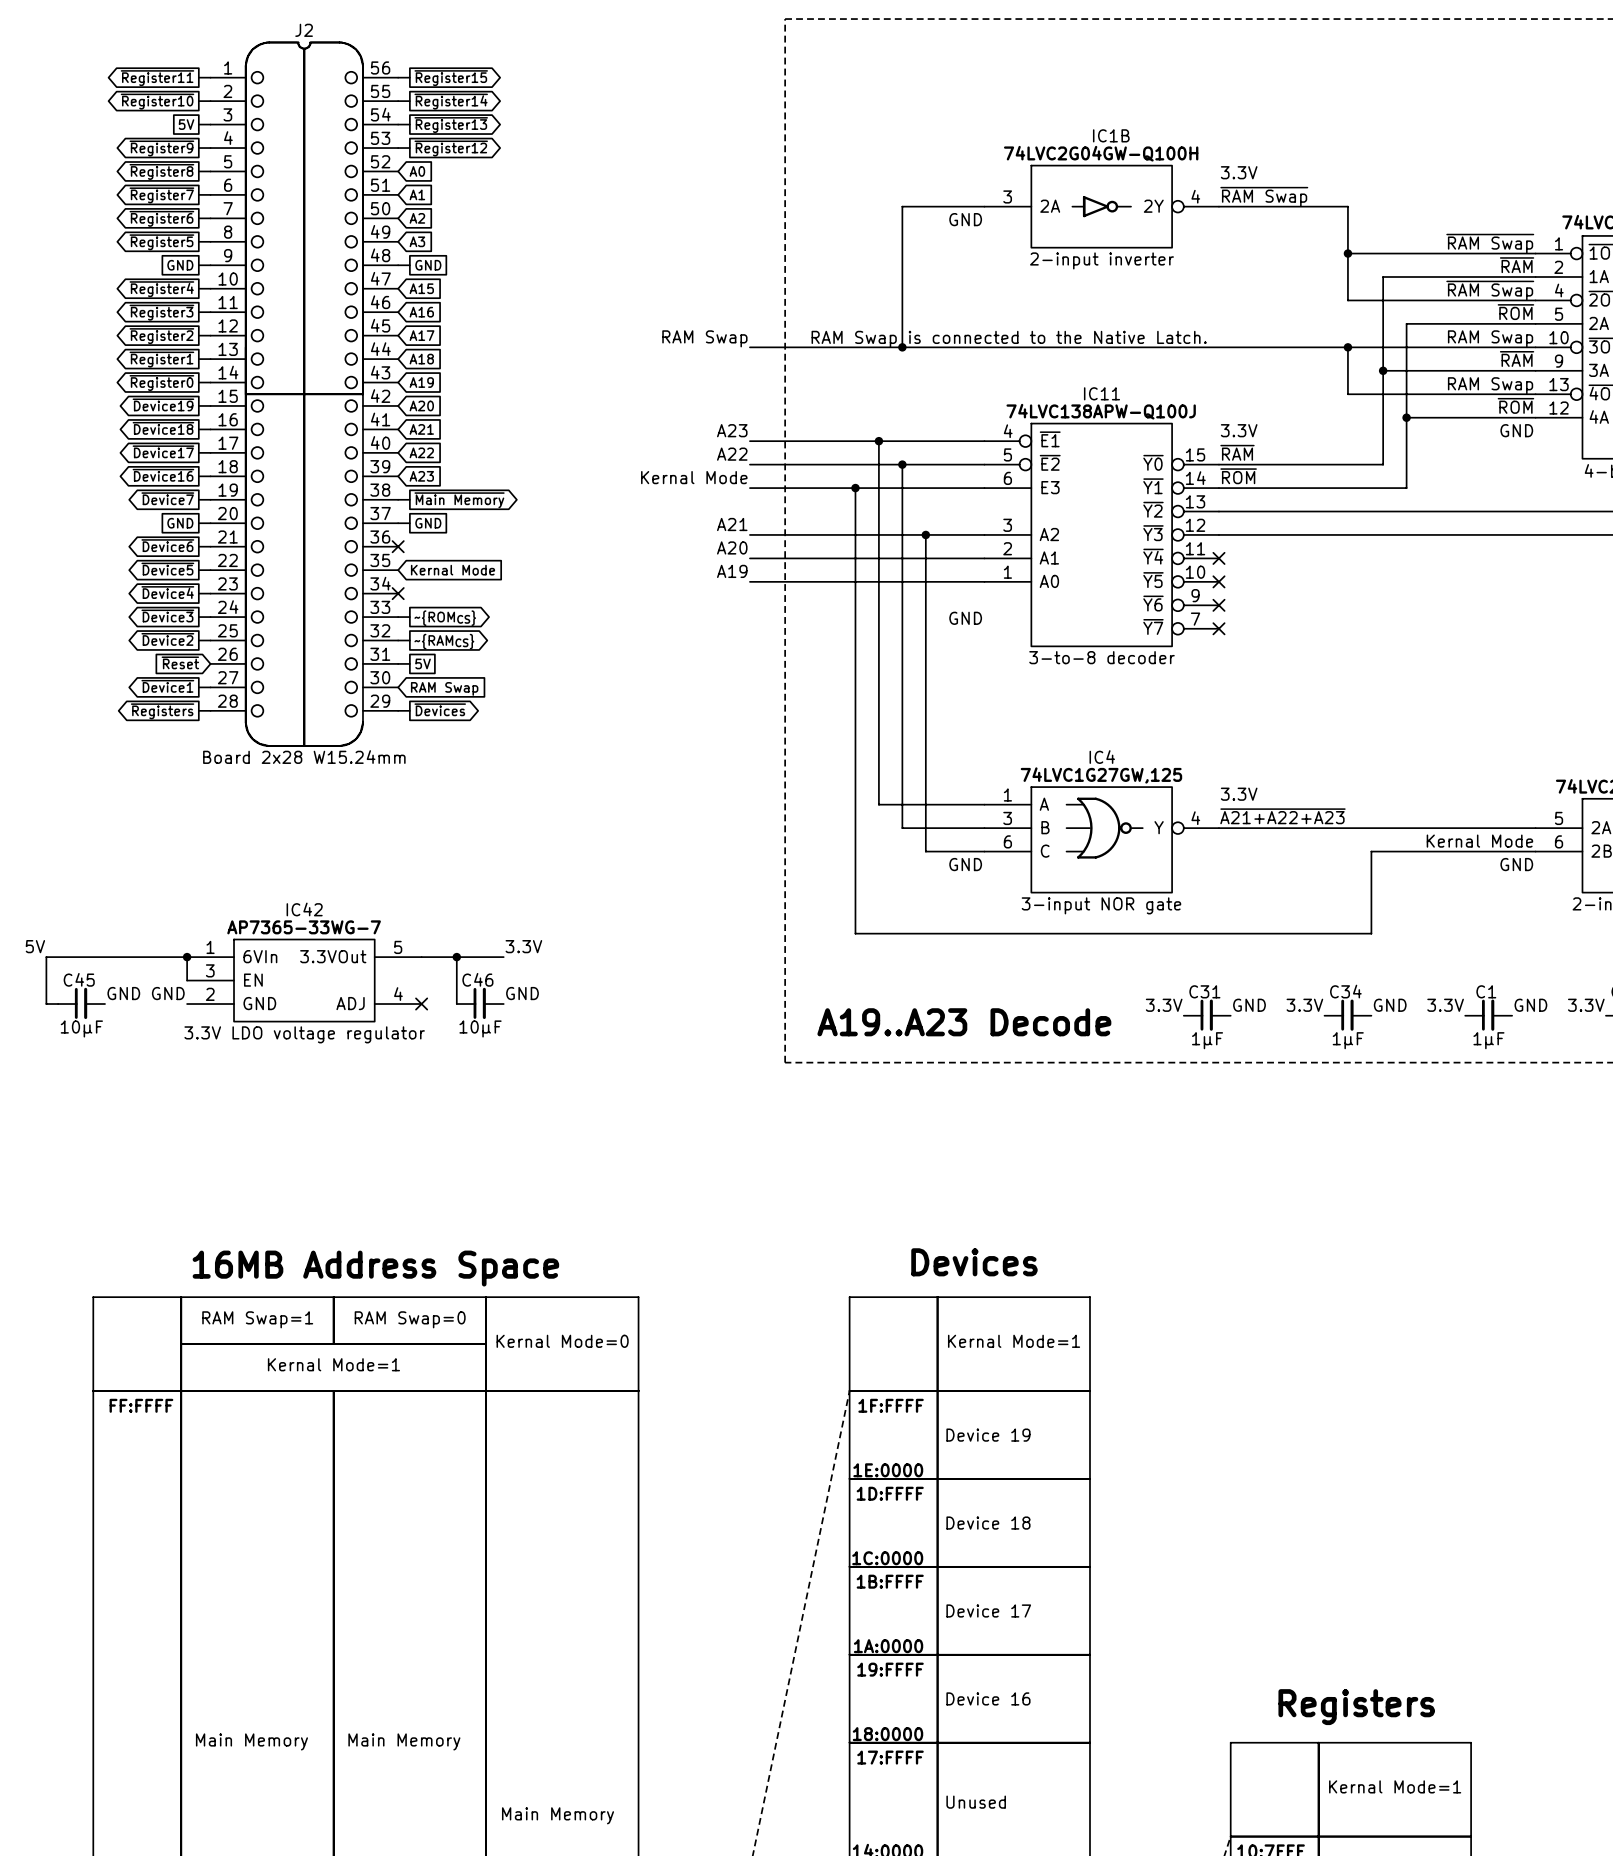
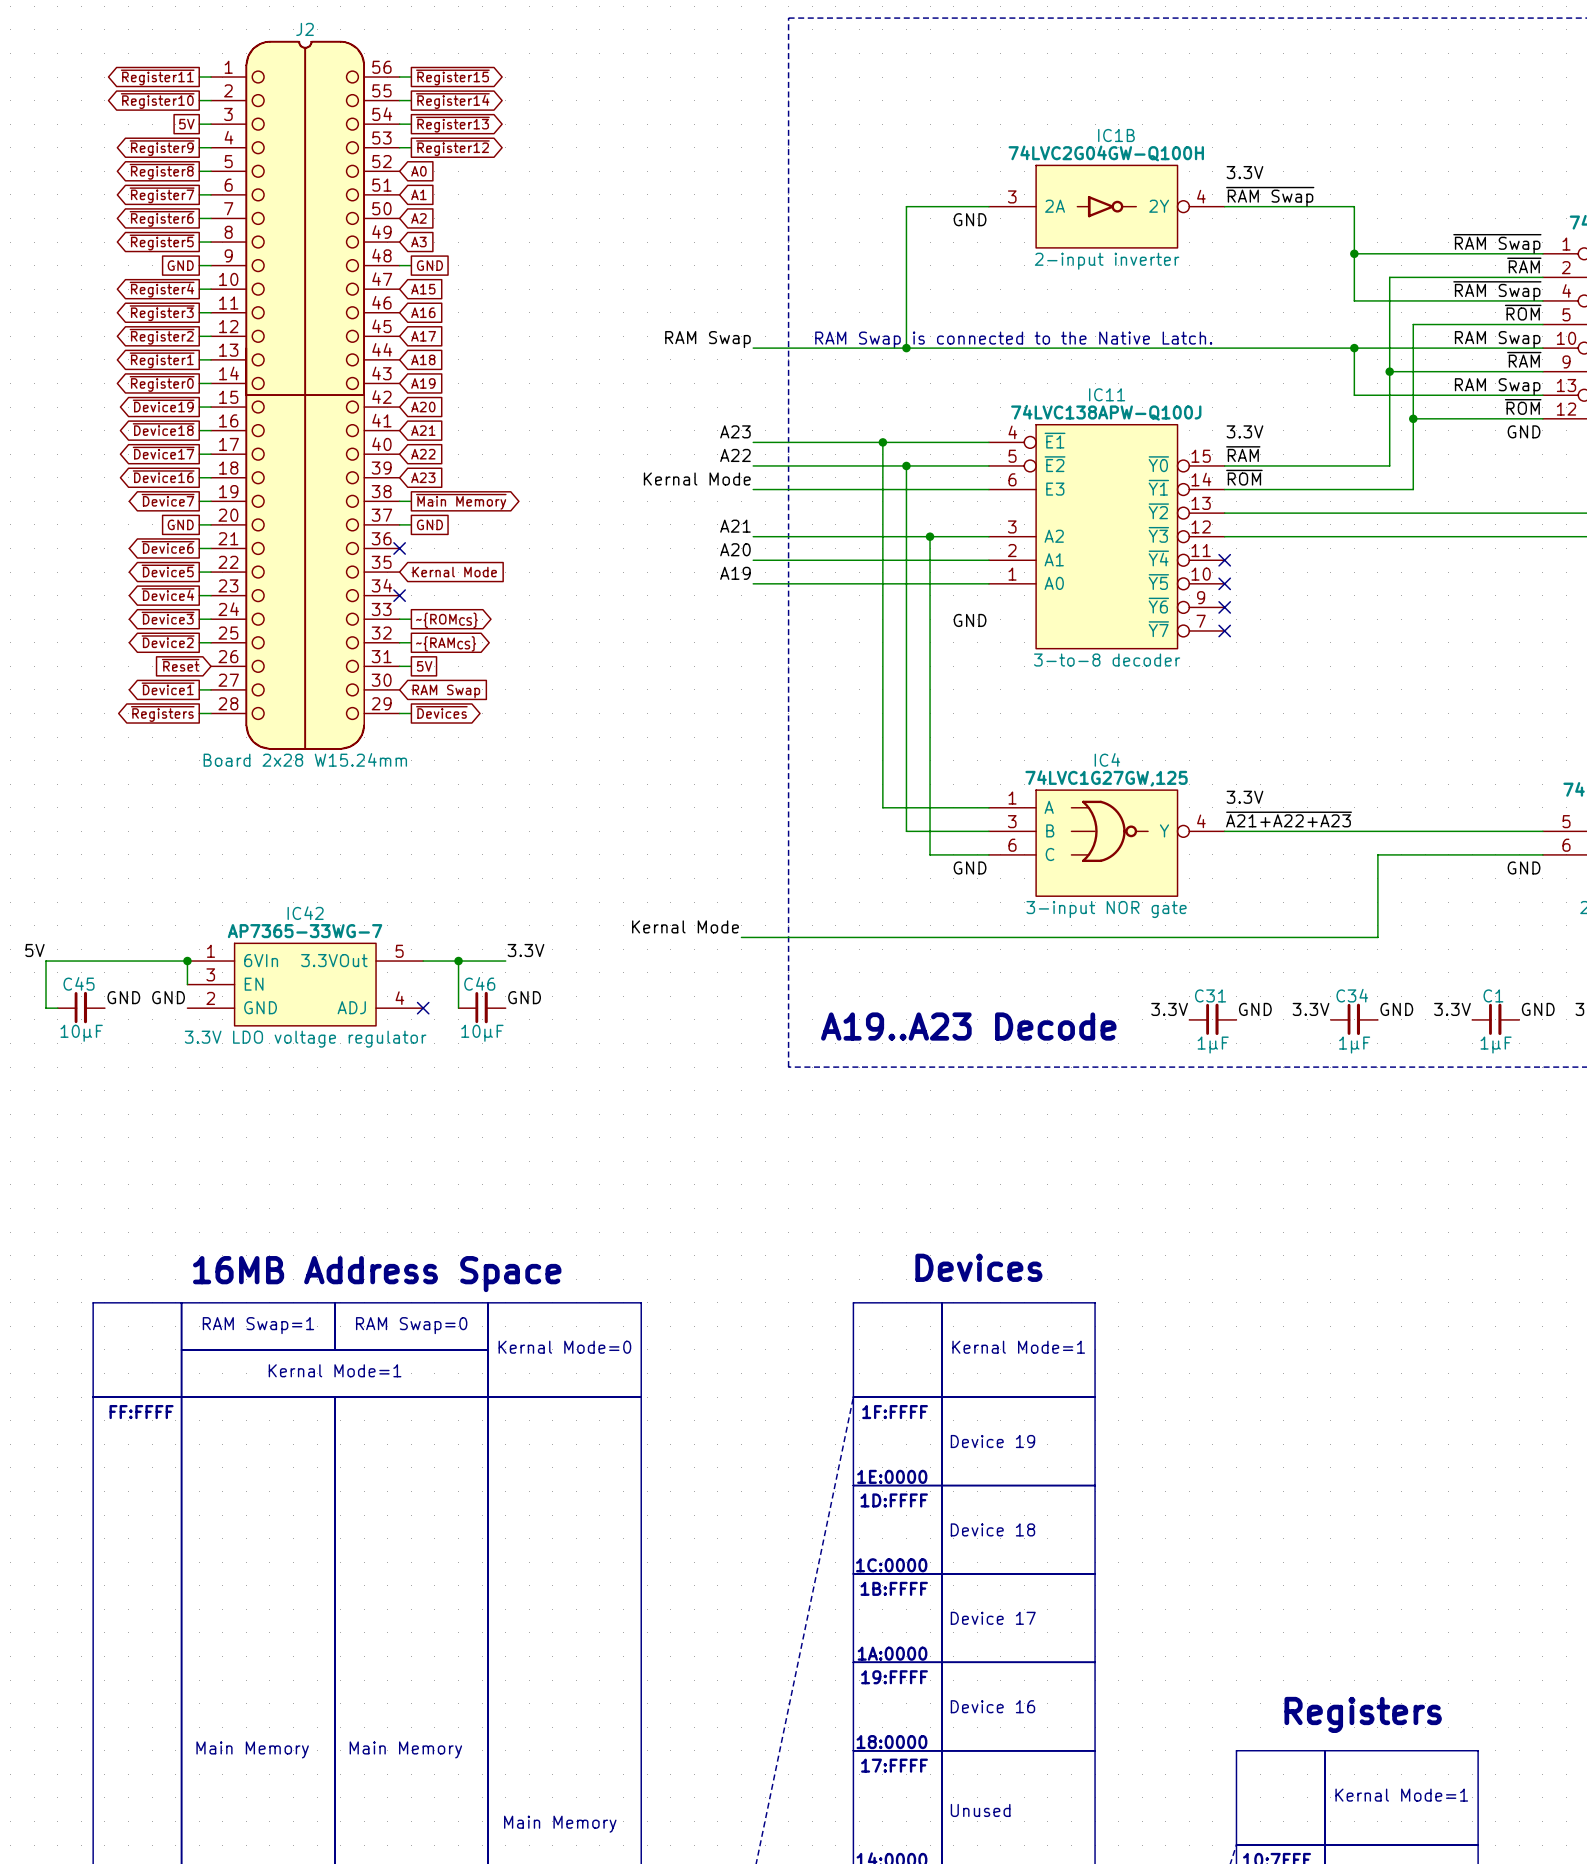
wire: (855, 488) (855, 933) -> (741, 937) (859, 937)
junction: (855, 488) -> none
label: Kernal Mode (1479, 841) -> none
label: none -> Kernal Mode (685, 926)

